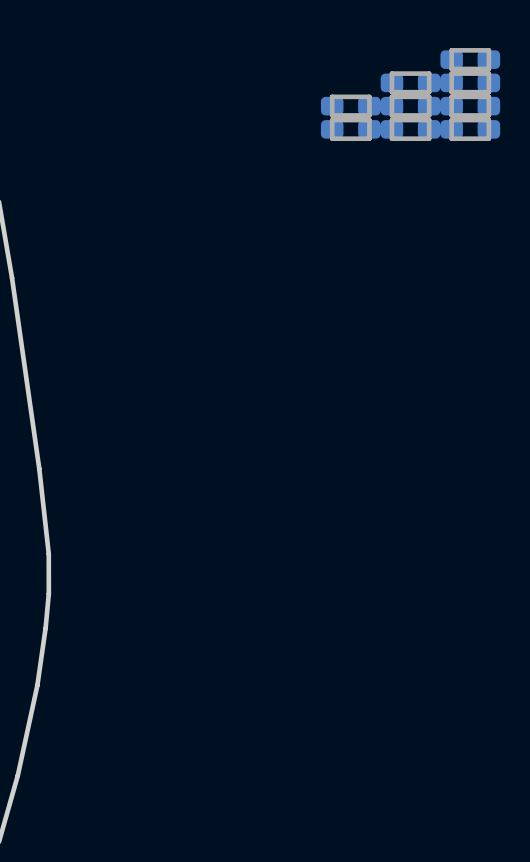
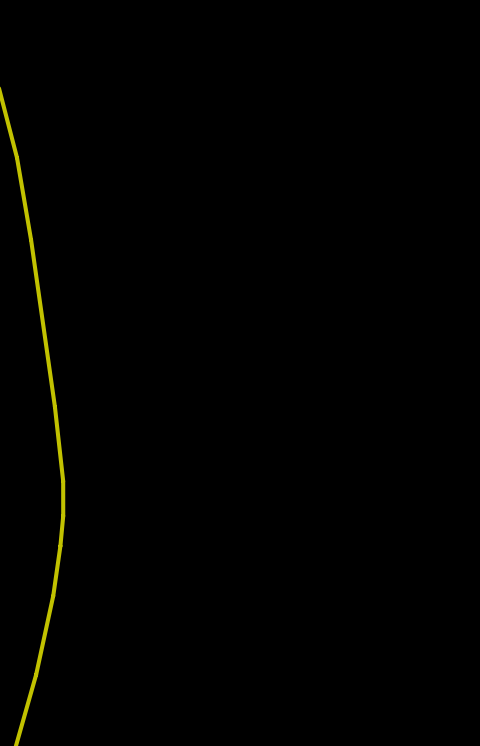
part: (470, 59) -> none
part: (410, 82) -> none
part: (470, 82) -> none
part: (350, 106) -> none
part: (410, 106) -> none
part: (470, 106) -> none
part: (350, 129) -> none
part: (410, 129) -> none
part: (470, 129) -> none

